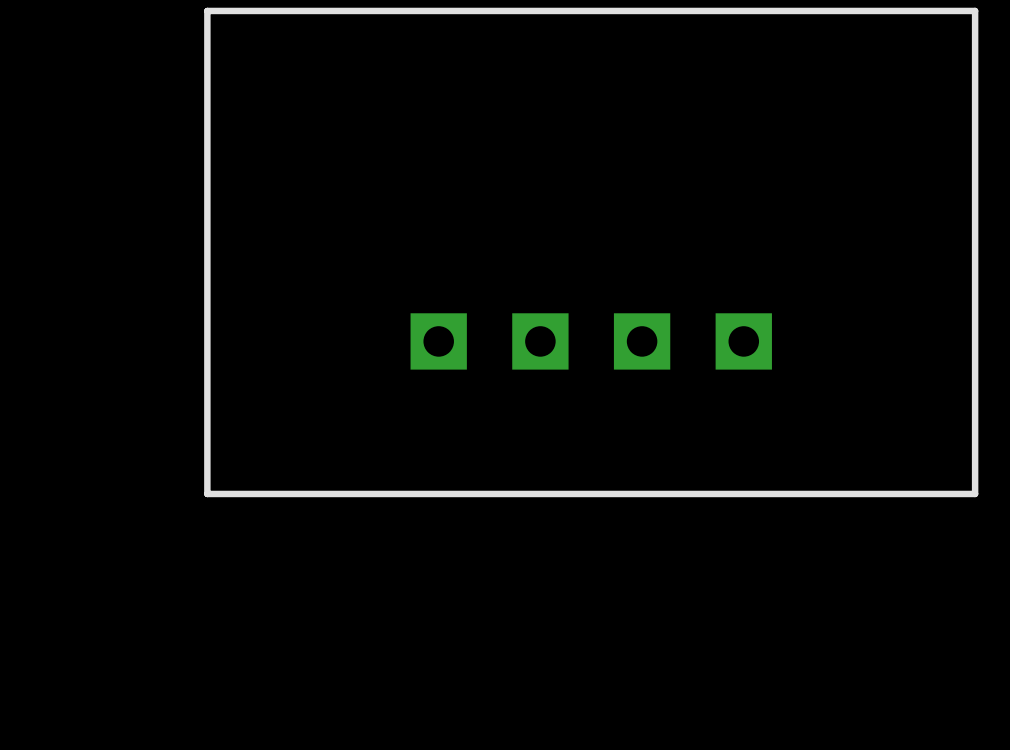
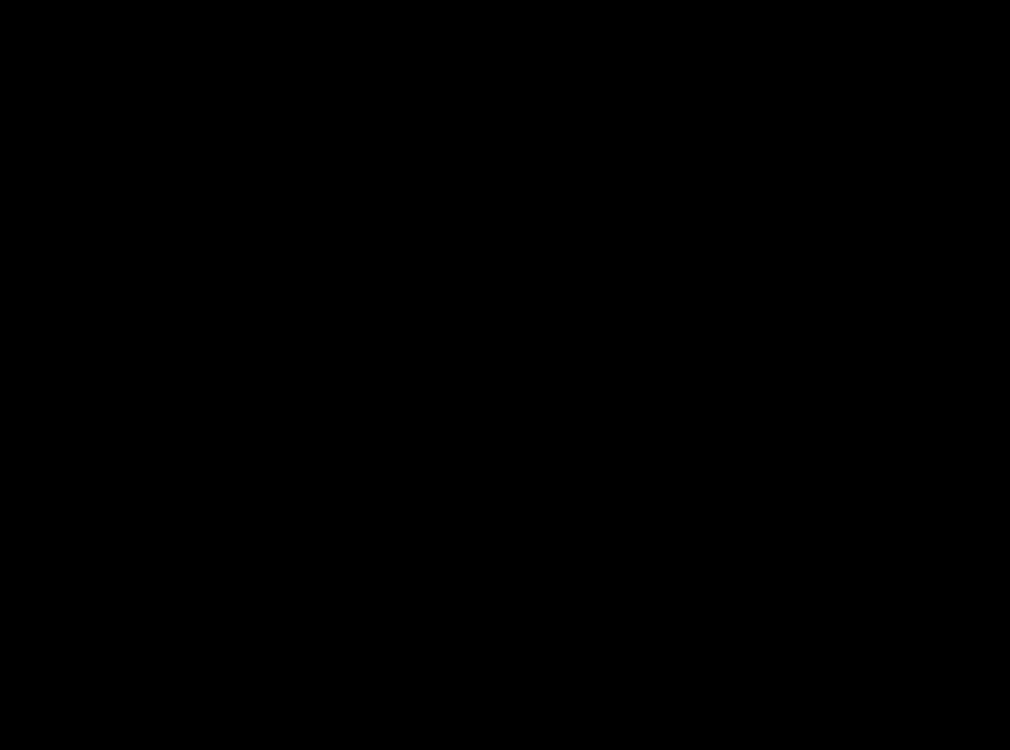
part: (591, 252) -> none

